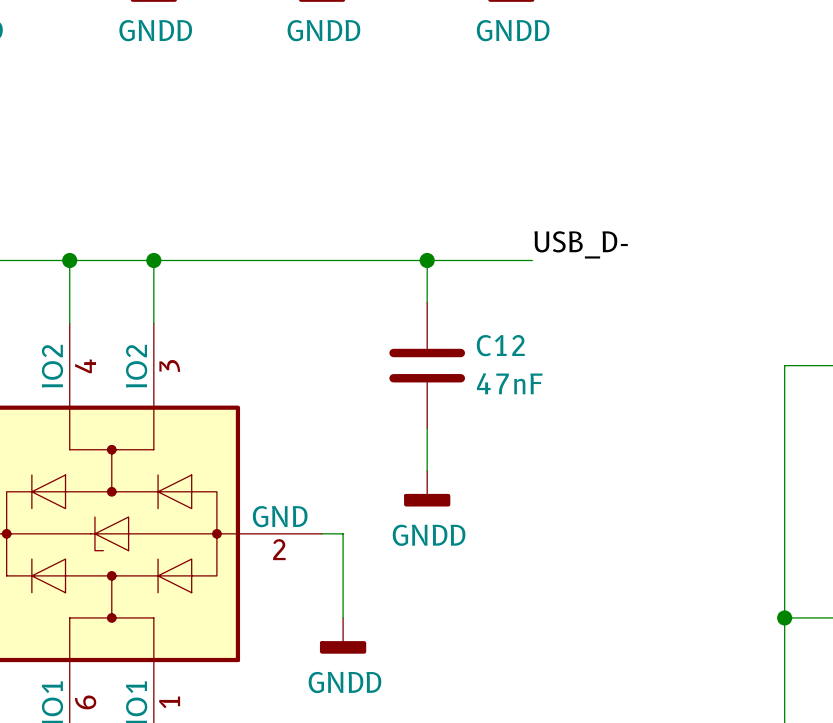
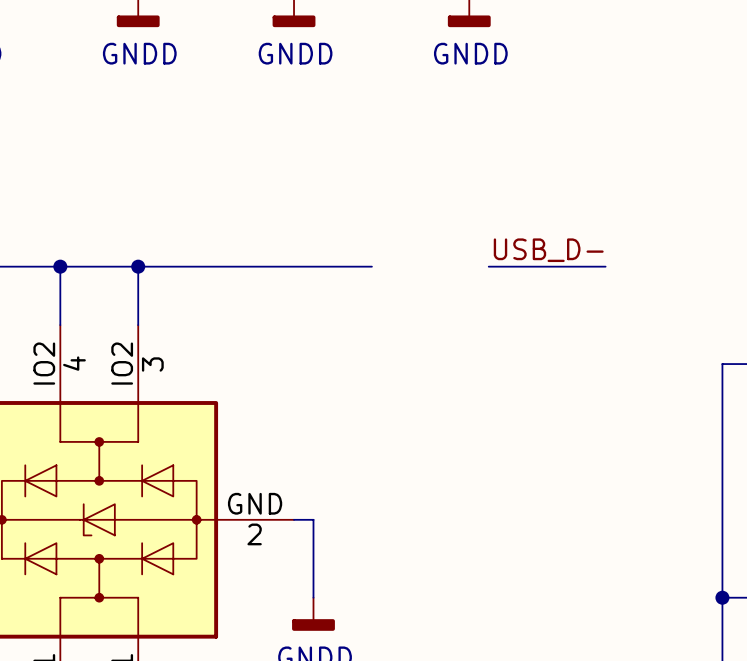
wire: (406, 260) (532, 260) -> (605, 266) (488, 266)
wire: (427, 260) (427, 302) -> none
junction: (427, 260) -> none
C12: 47nF (427, 365) -> none
wire: (427, 428) (427, 470) -> none
power symbol: GNDD (427, 488) -> none

